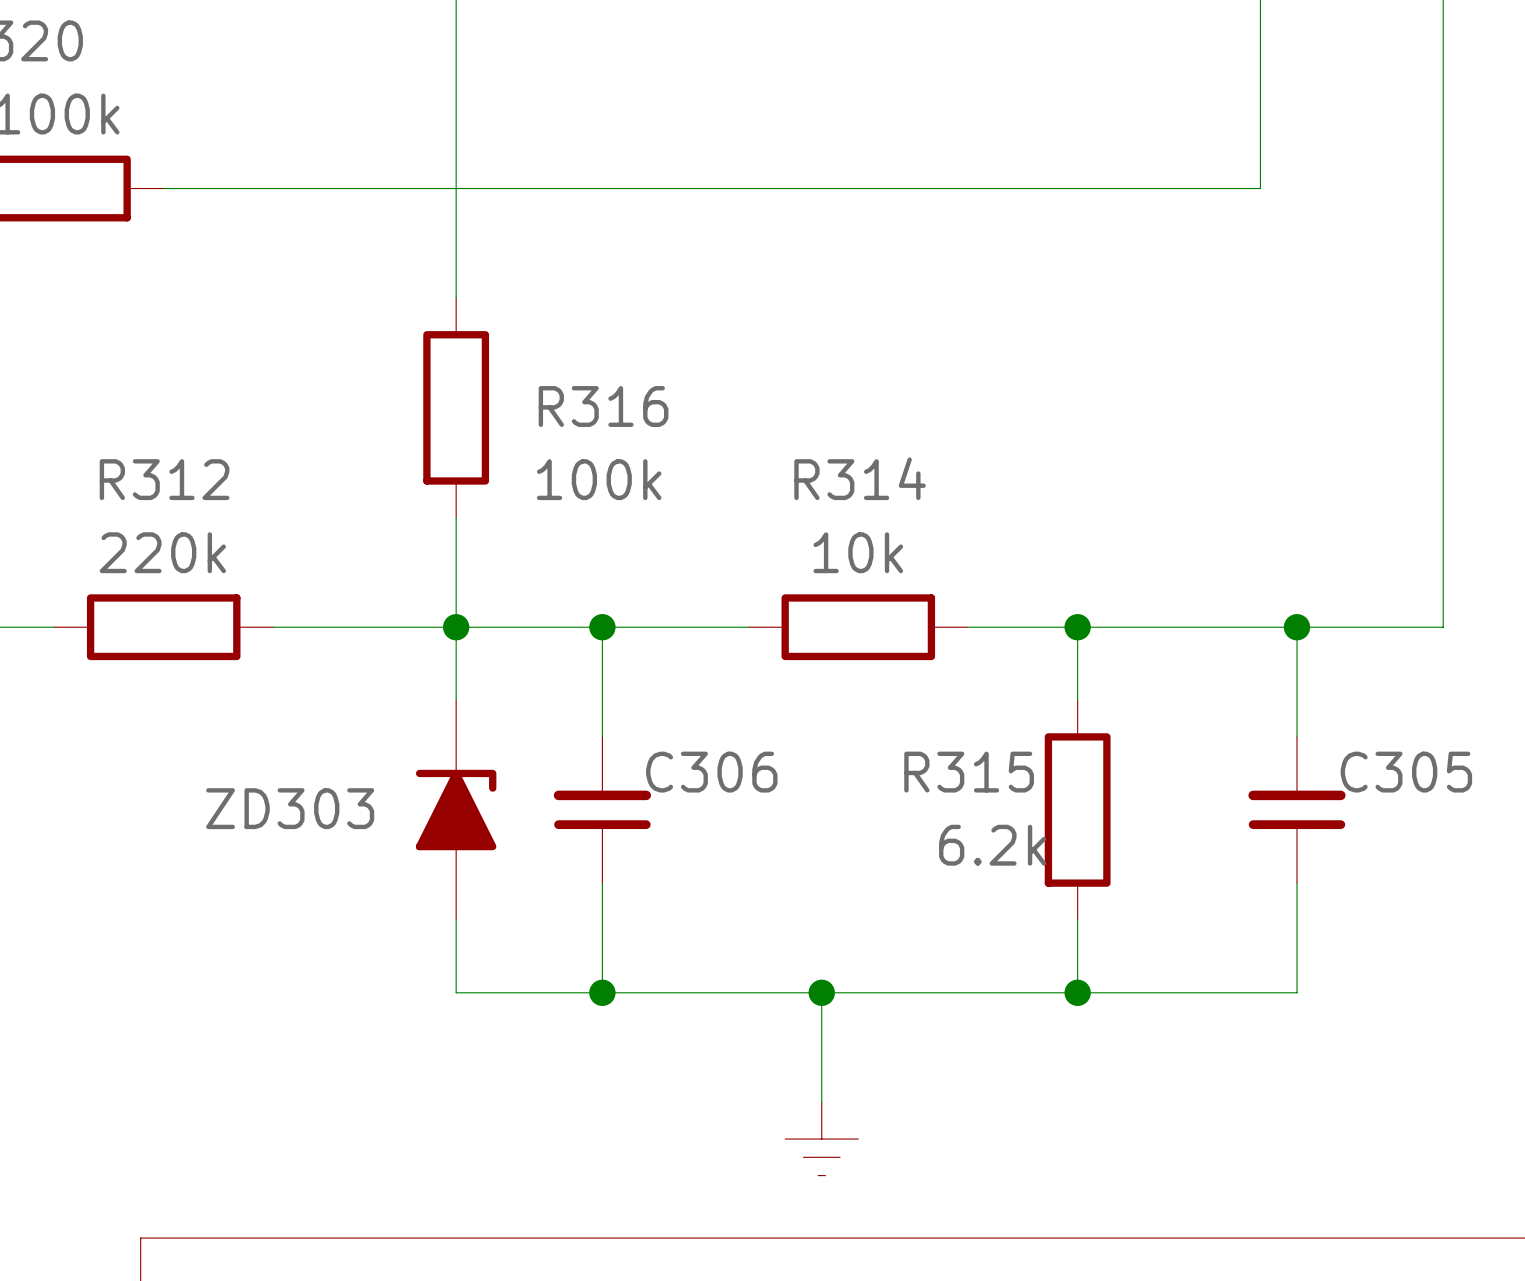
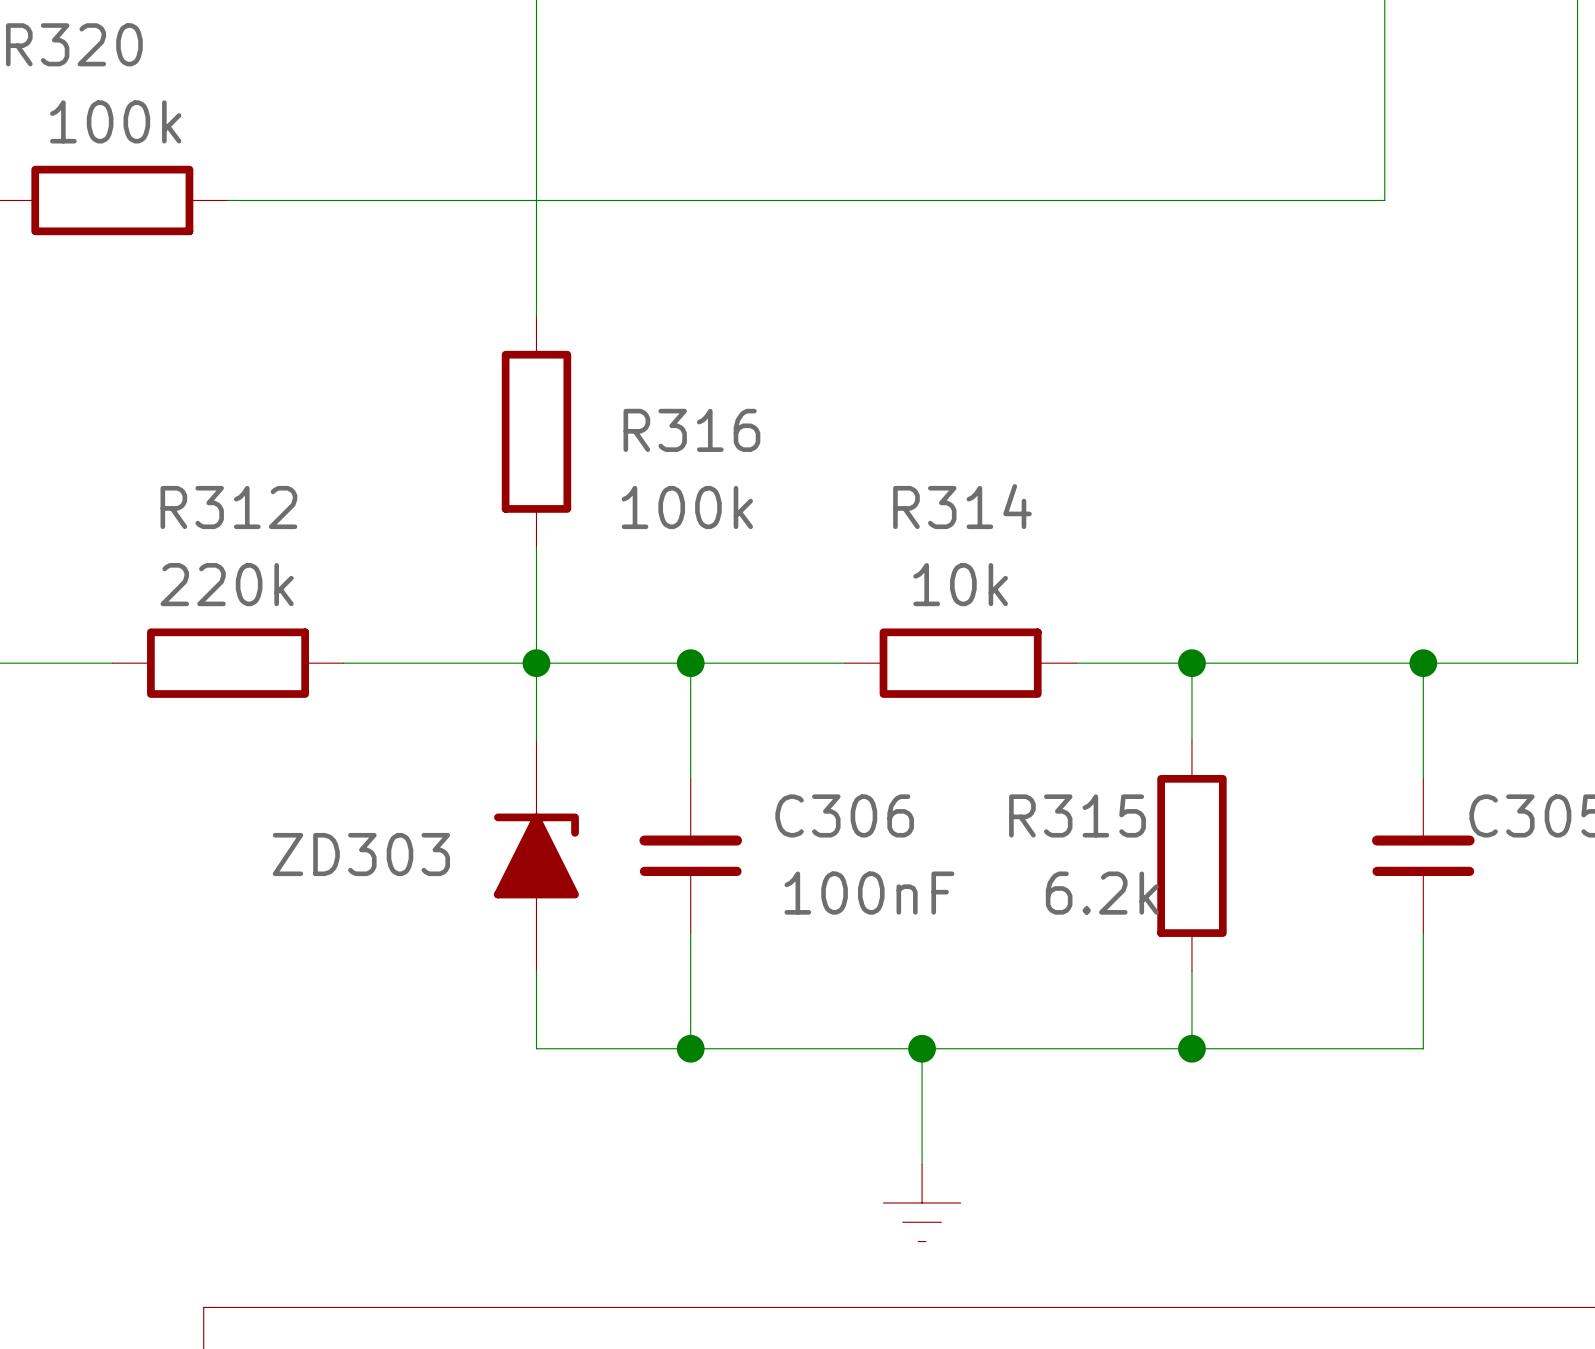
C306 name position: C306 (711, 772) -> C306 (844, 815)
C306 value: none -> 100nF (869, 893)

